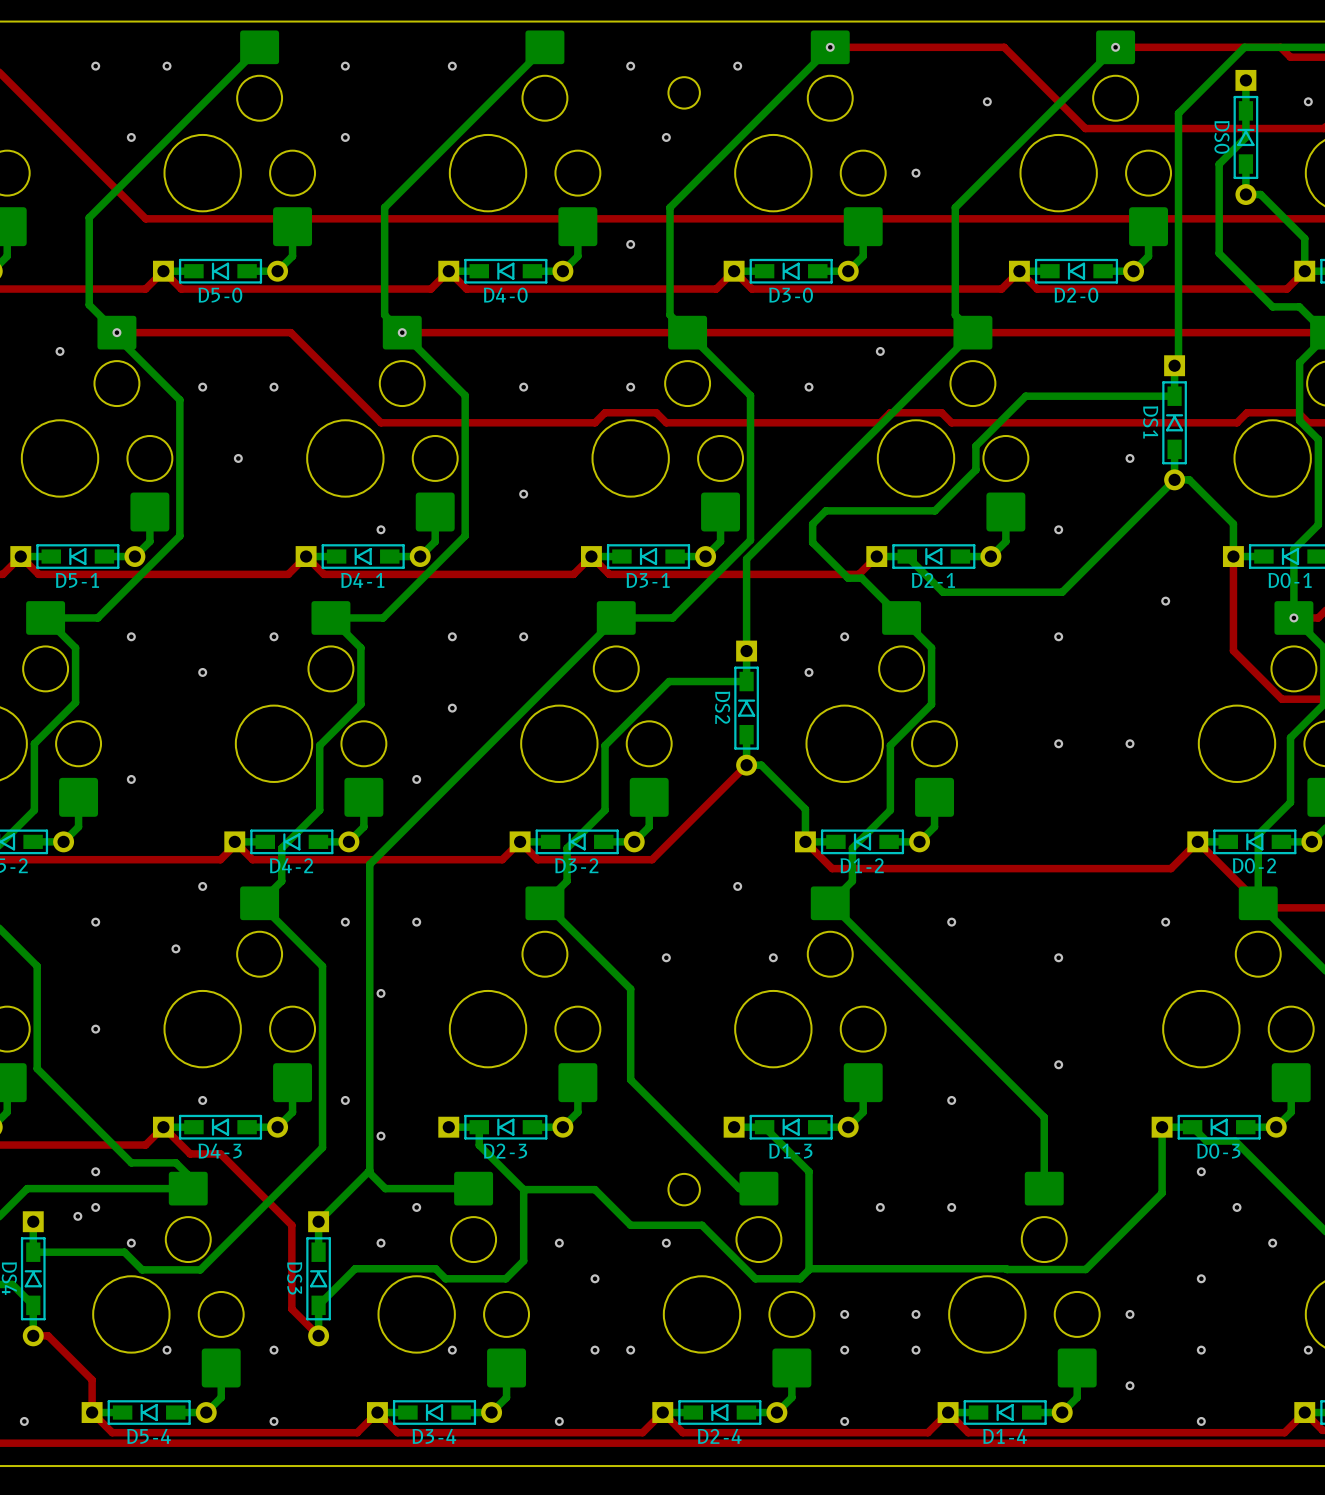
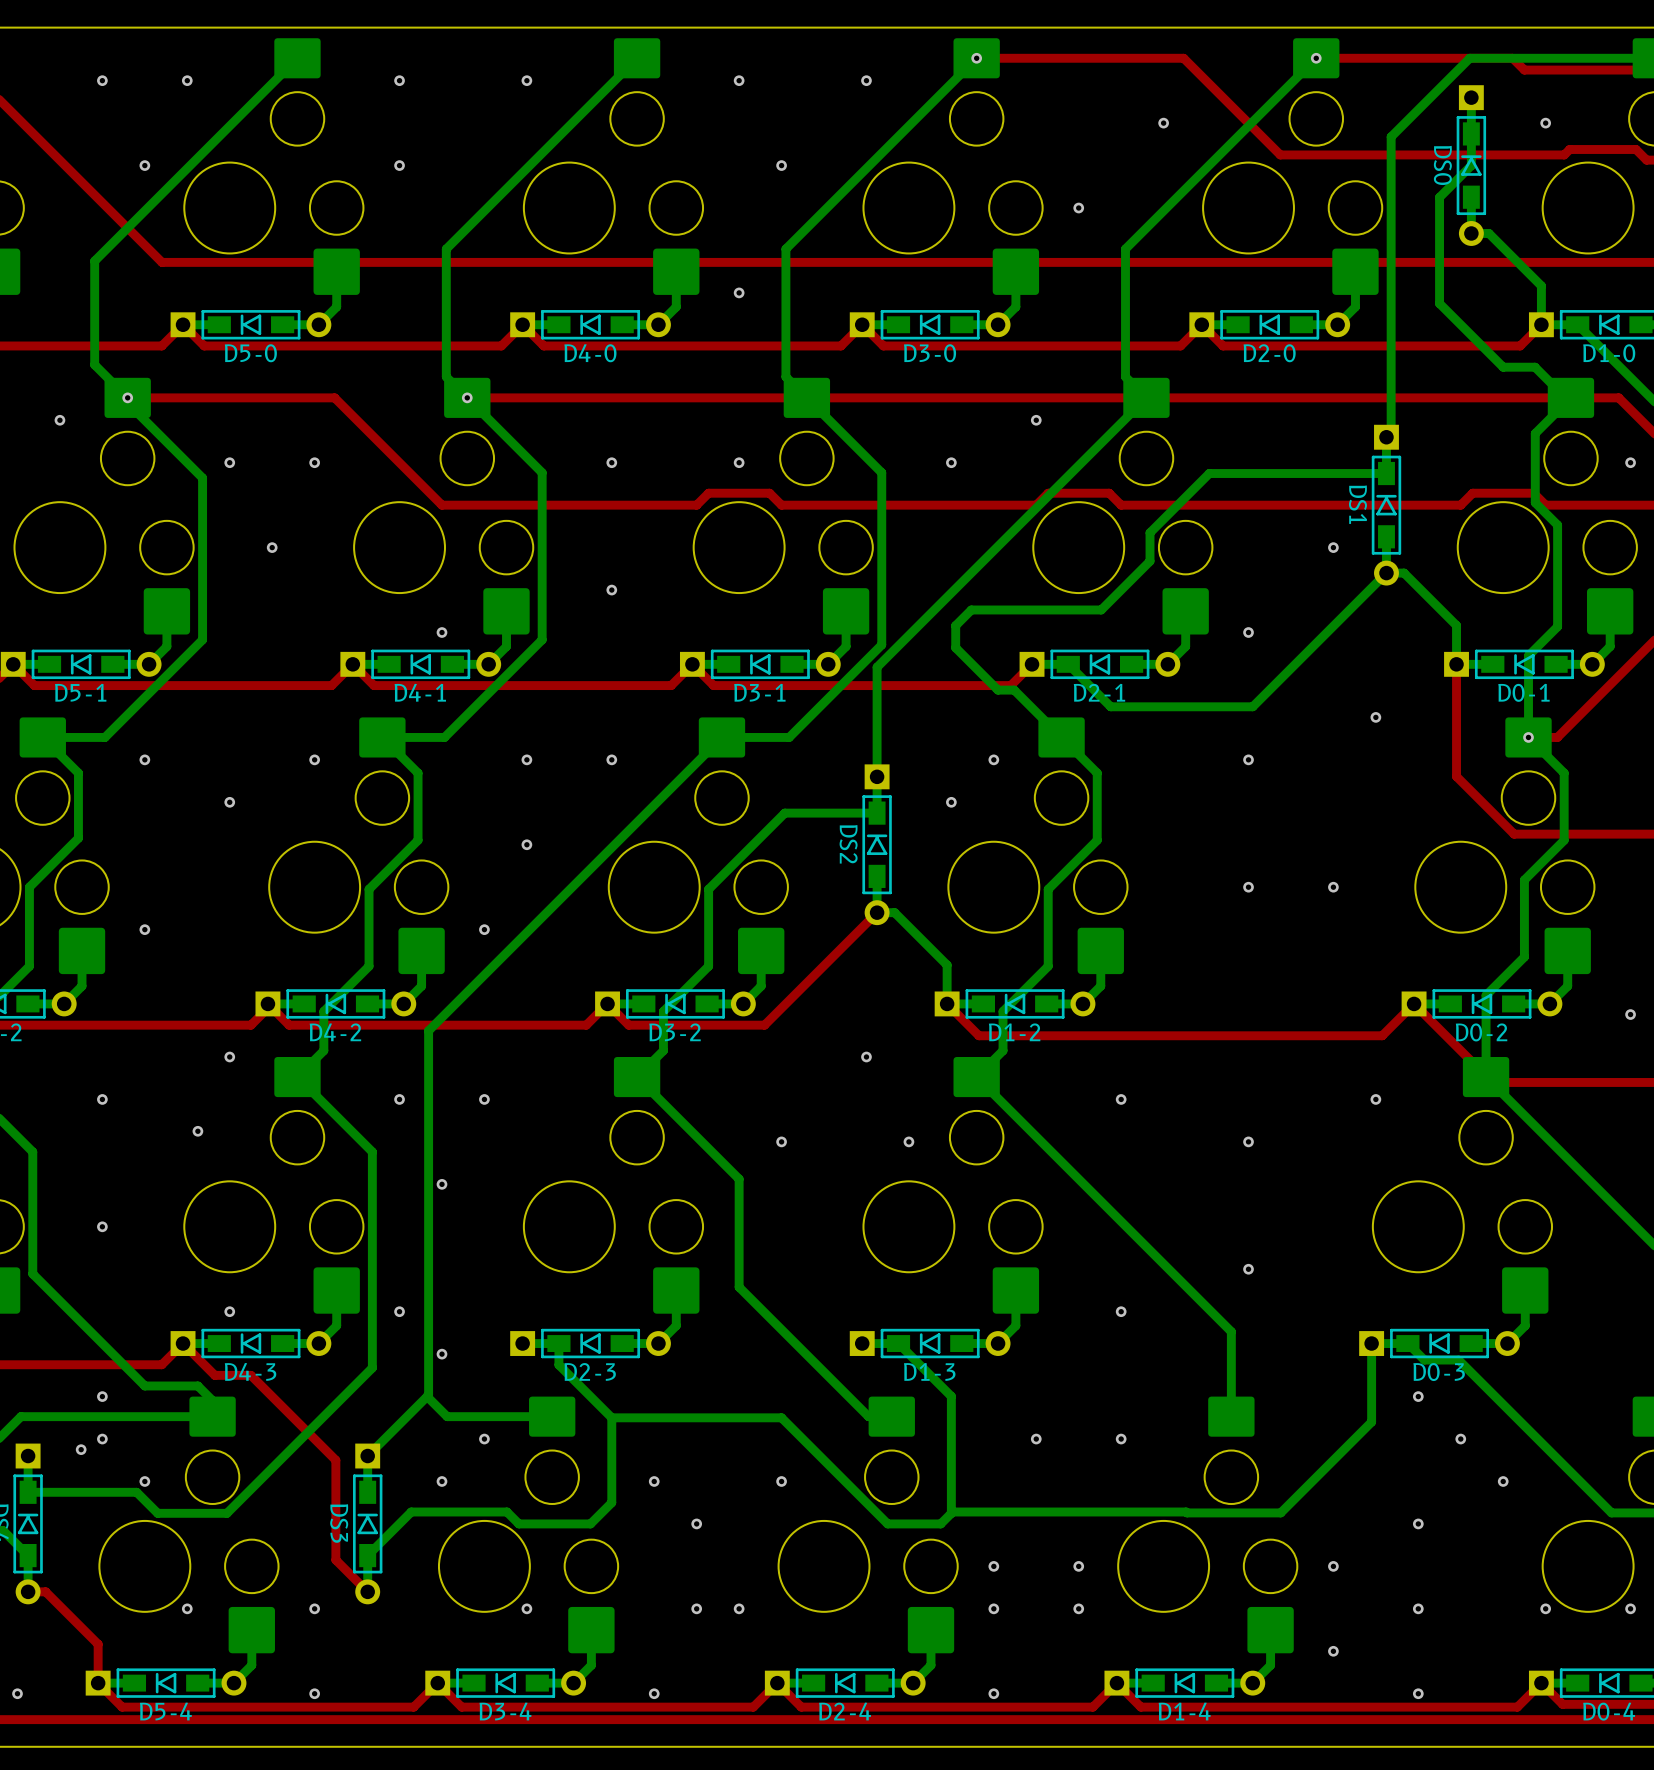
round board edge: [668, 76, 701, 109] -> none
round board edge: [668, 1173, 701, 1206] -> none
bottom track: (595, 1189) (630, 1225) (702, 1225) -> (696, 1417) (781, 1417) (824, 1460)

